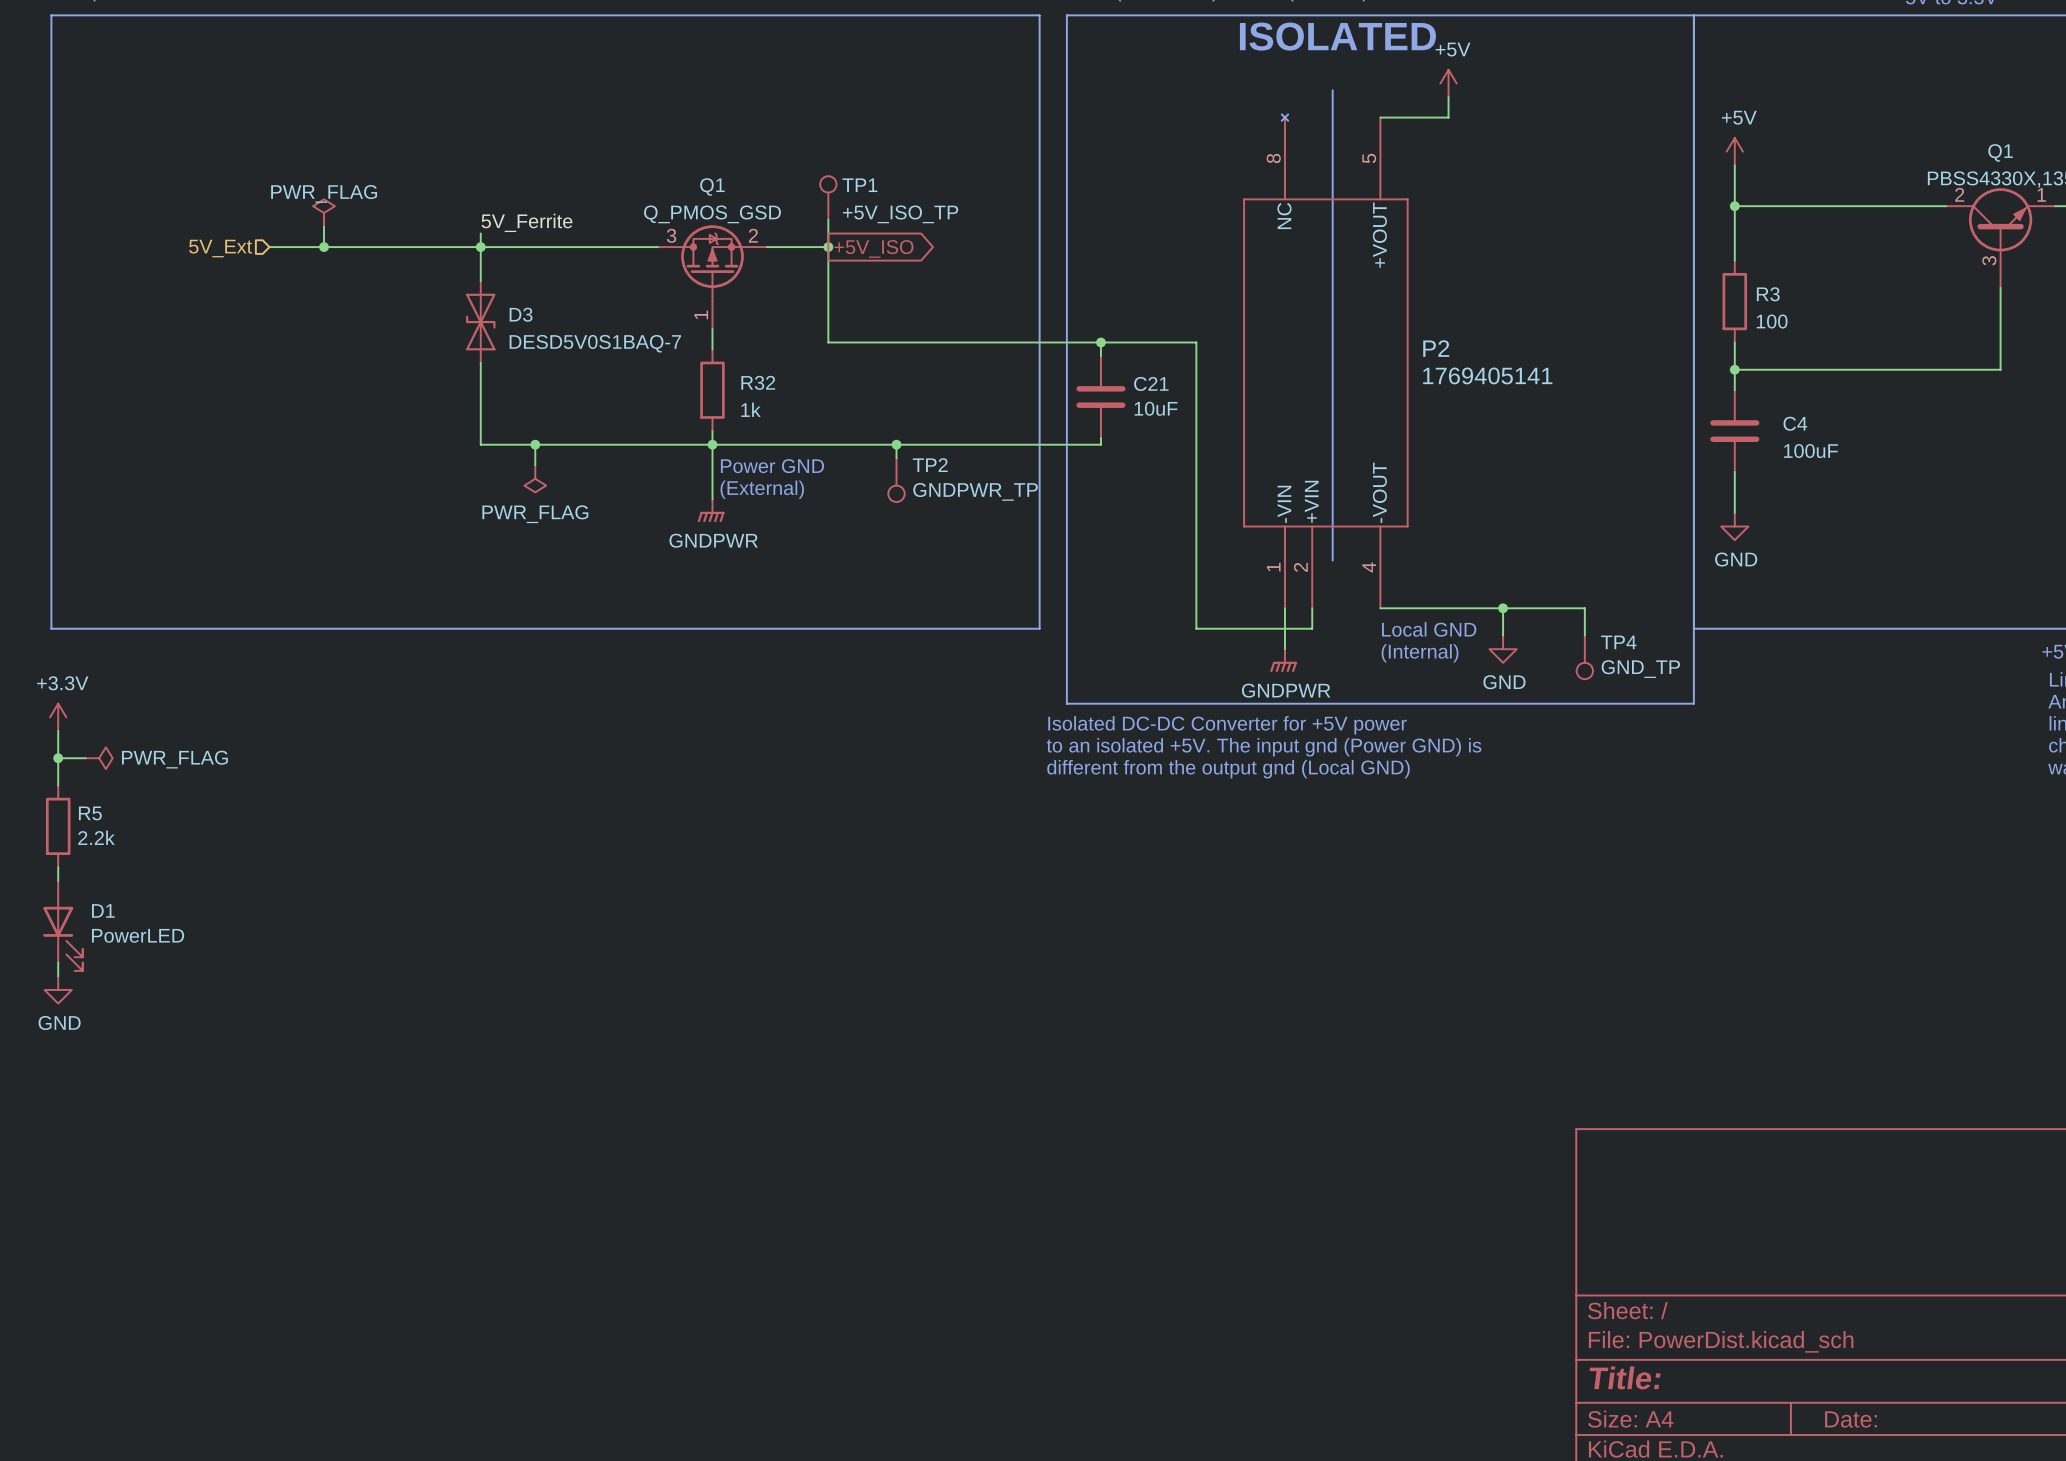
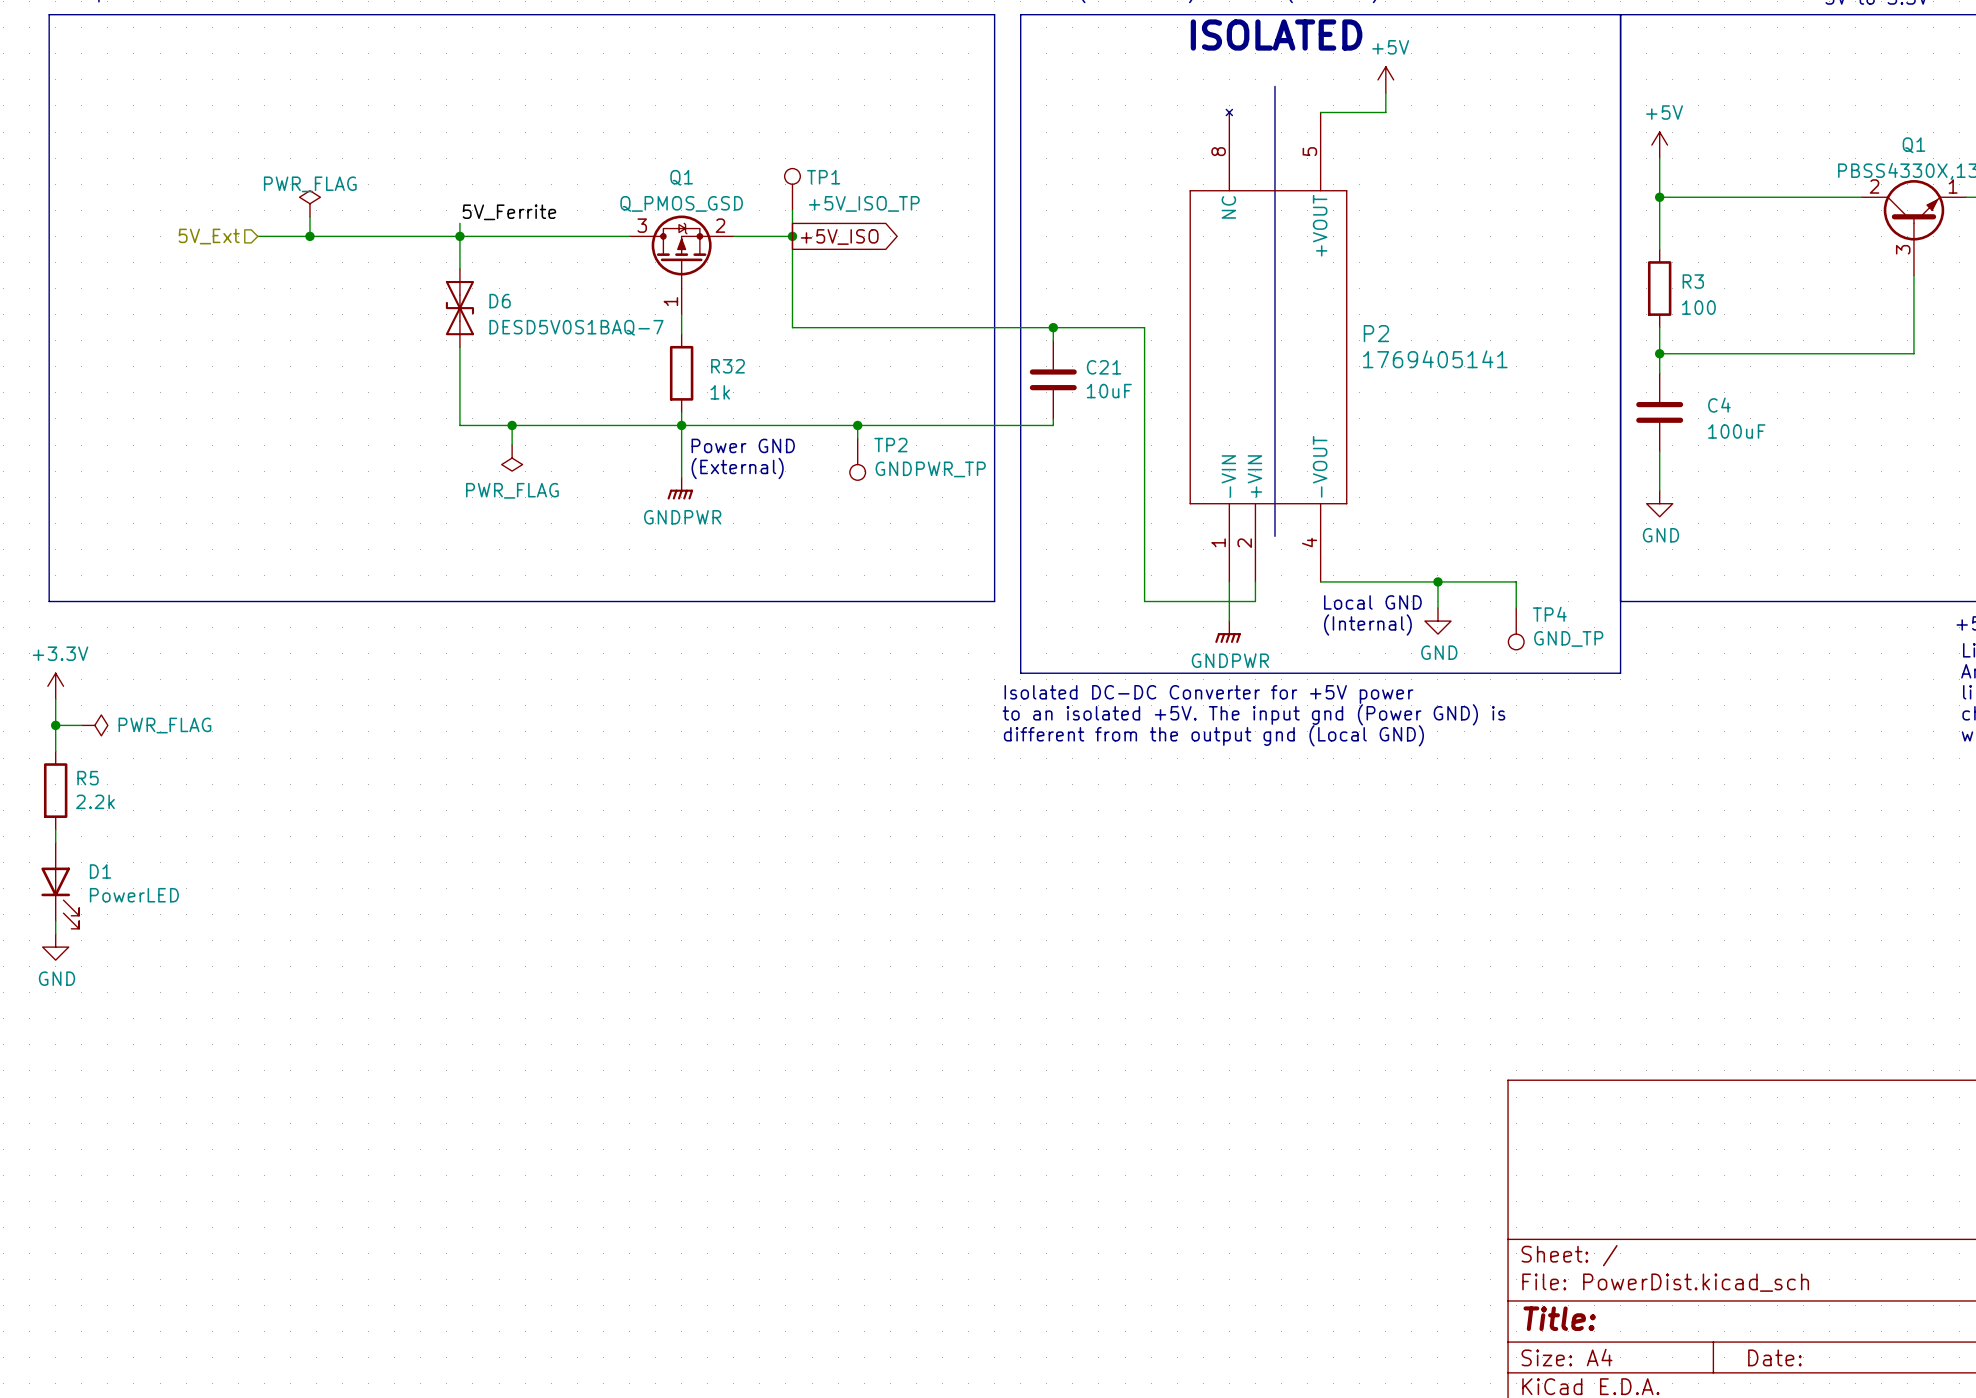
D3 name: D3 (521, 314) -> D6 (500, 301)

